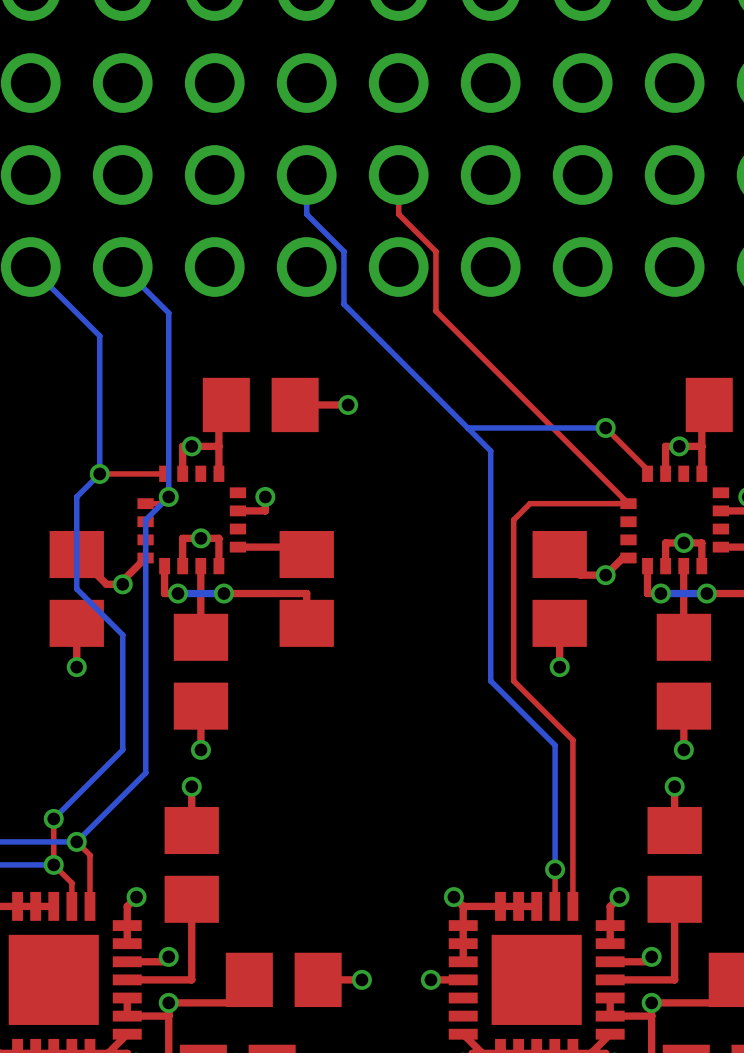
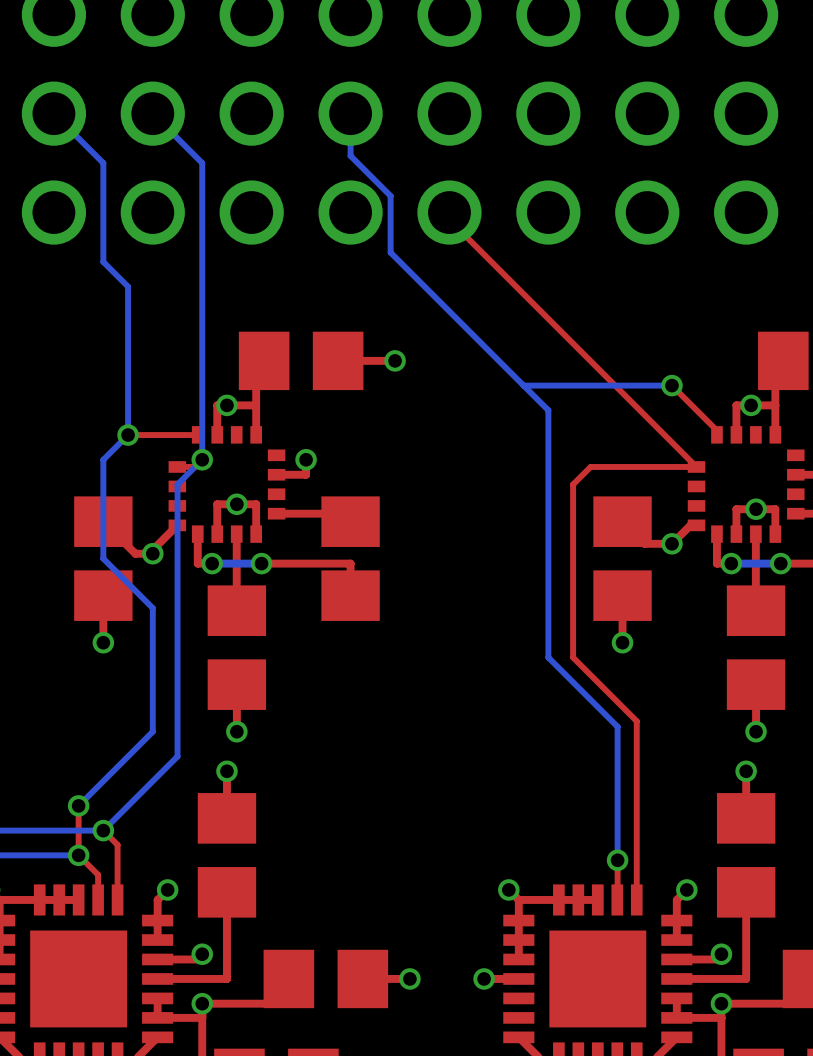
top track: (398, 175) (398, 214) (435, 251) (435, 311) -> (449, 212) (449, 219) (489, 259)
bottom track: (30, 266) (76, 312) -> (53, 113) (103, 163) (103, 261)
bottom track: (122, 266) (168, 312) -> (152, 113) (202, 163) (202, 261)

